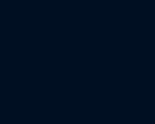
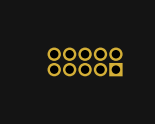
part: none -> (85, 61)

